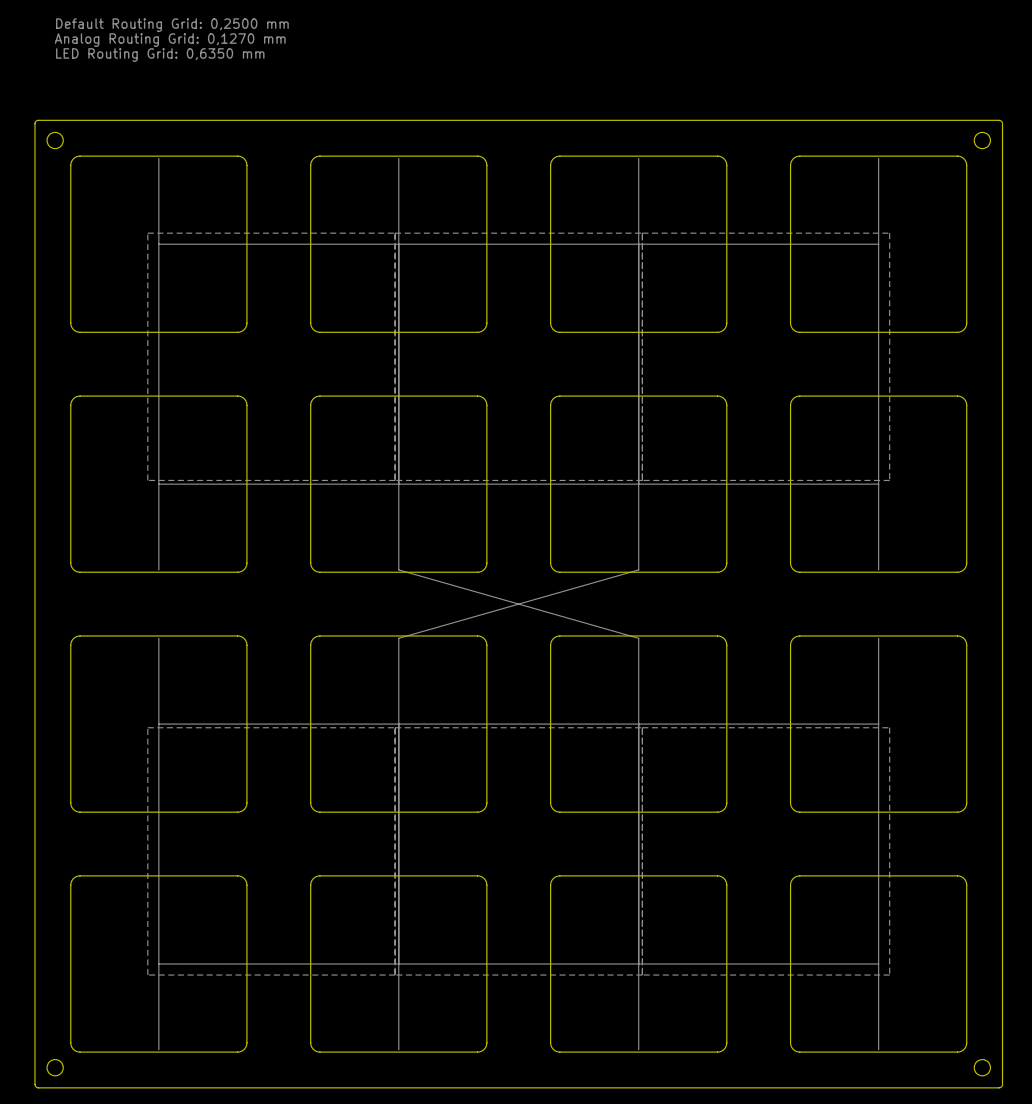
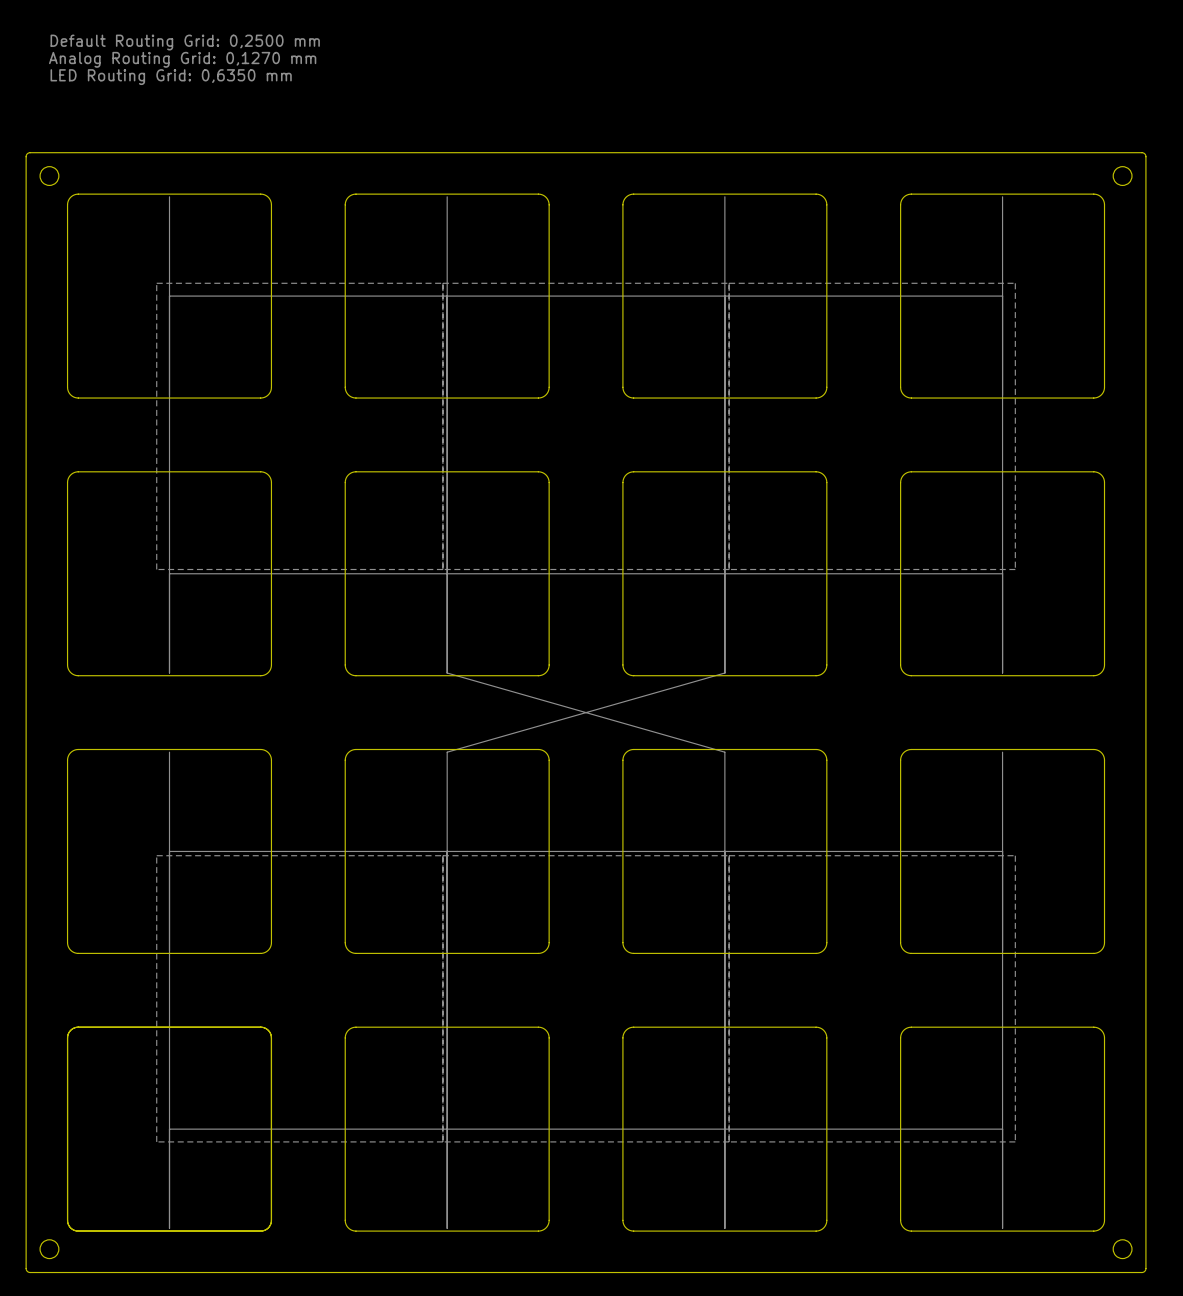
drawing: none -> [25, 152, 1147, 1273]

